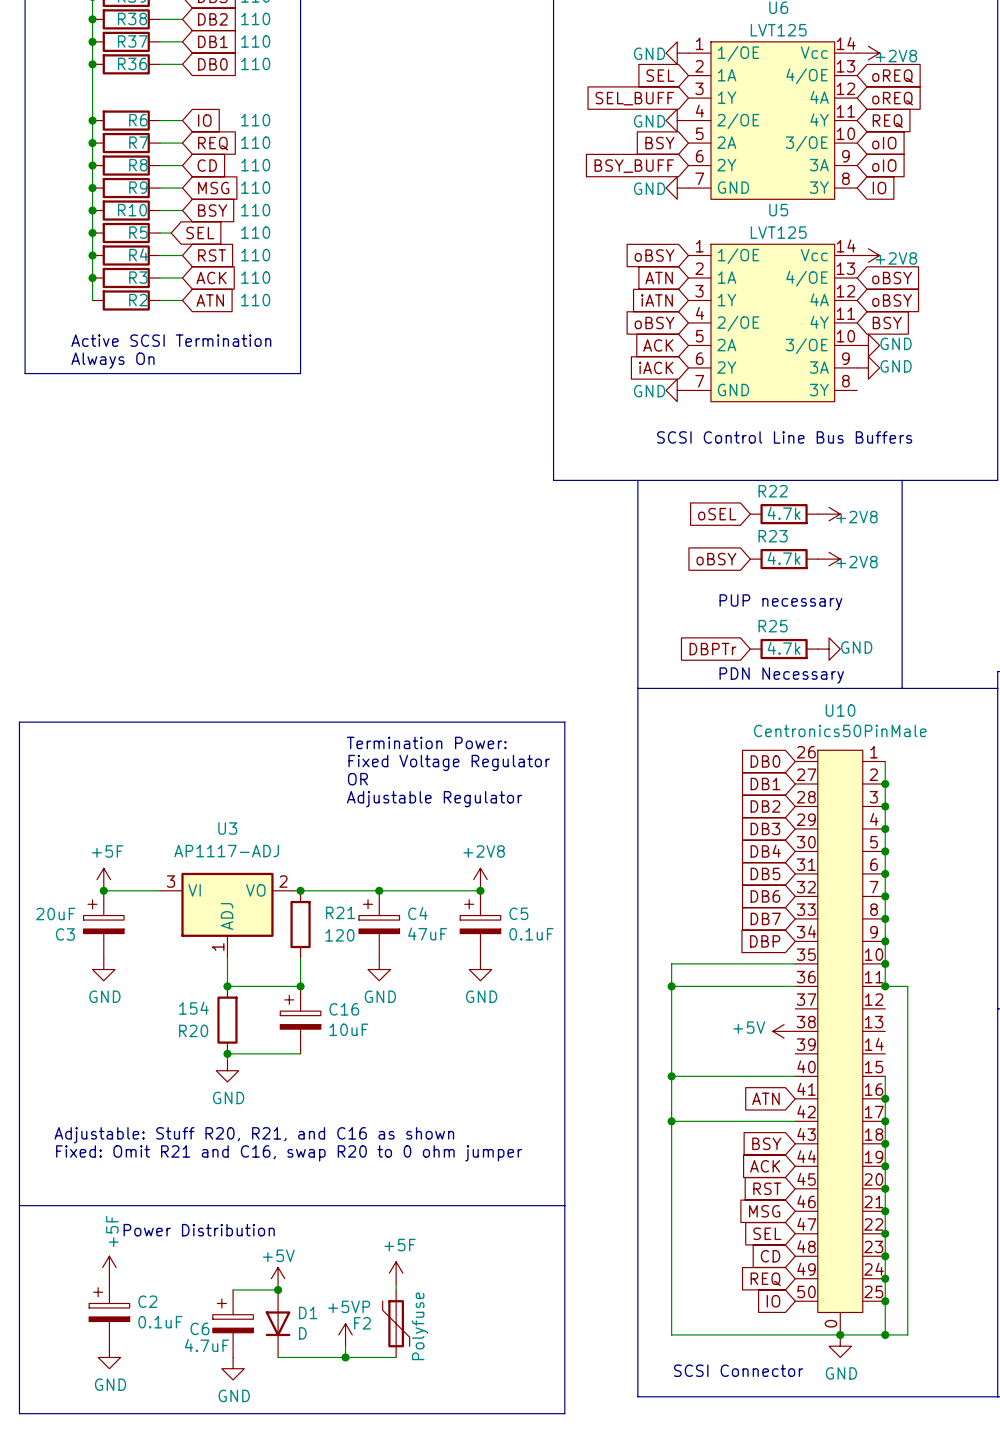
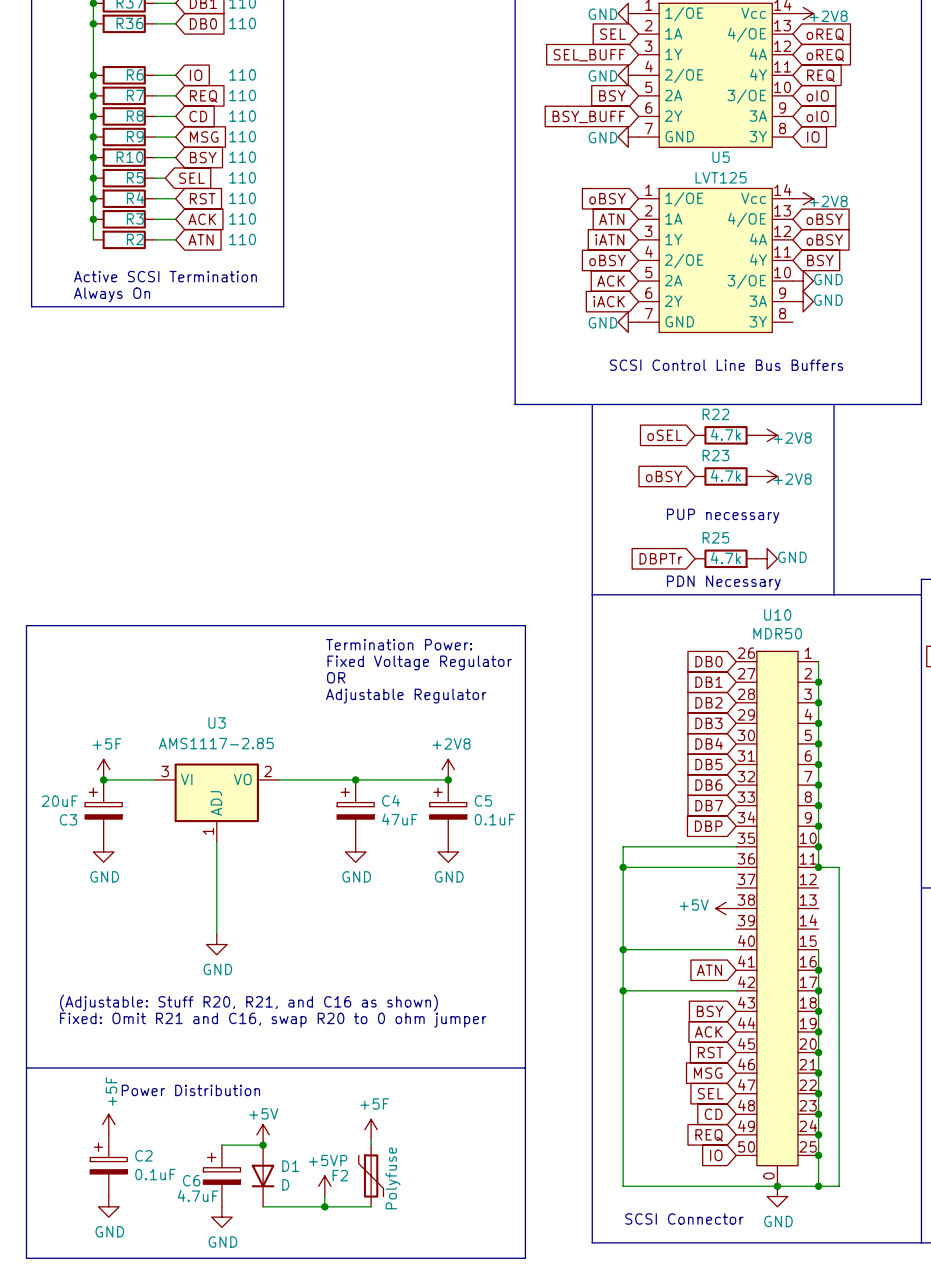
U10 value: Centronics50PinMale (840, 730) -> MDR50 (777, 633)
U3 value: AP1117-ADJ (226, 851) -> AMS1117-2.85 (216, 743)
junction: (300, 890) -> none
R21: 120 (300, 924) -> none
wire: (300, 958) (300, 986) (227, 986) -> none
junction: (227, 986) -> none
junction: (300, 986) -> none
R20: 154 (227, 1020) -> none
C16: 10uF (300, 1020) -> none
wire: (227, 1053) (300, 1053) -> (216, 929) (216, 867)
junction: (227, 1053) -> none
text: Adjustable: Stuff R20, R21, and C16 as shown (254, 1135) -> (Adjustable: Stuff R20, R21, and C16 as shown) (248, 1003)

